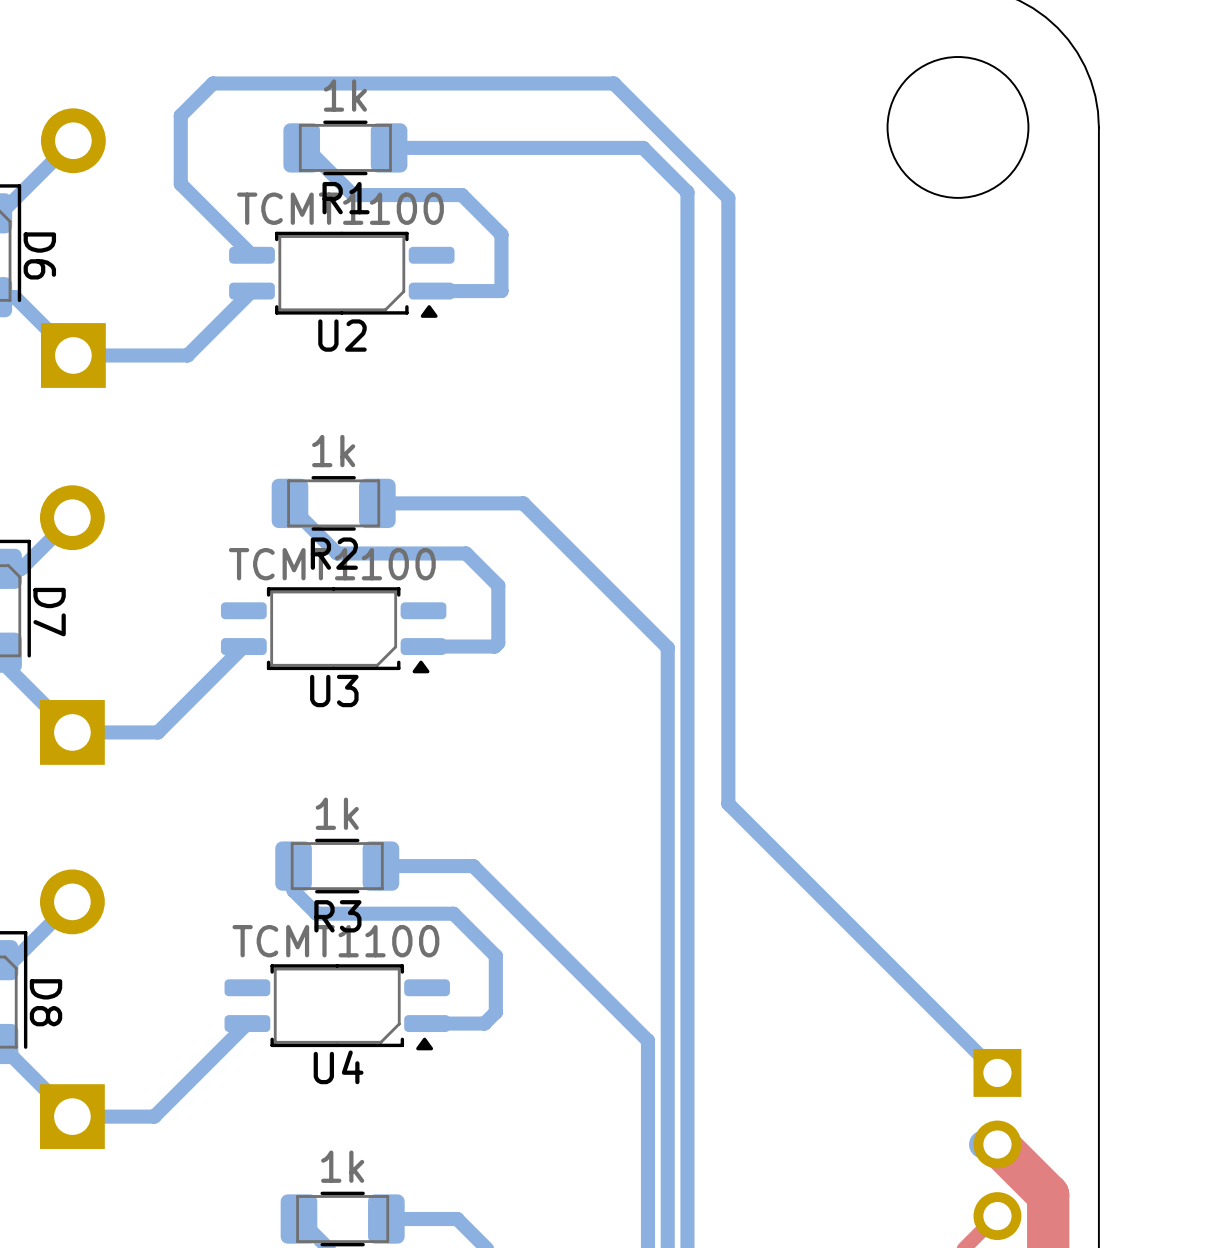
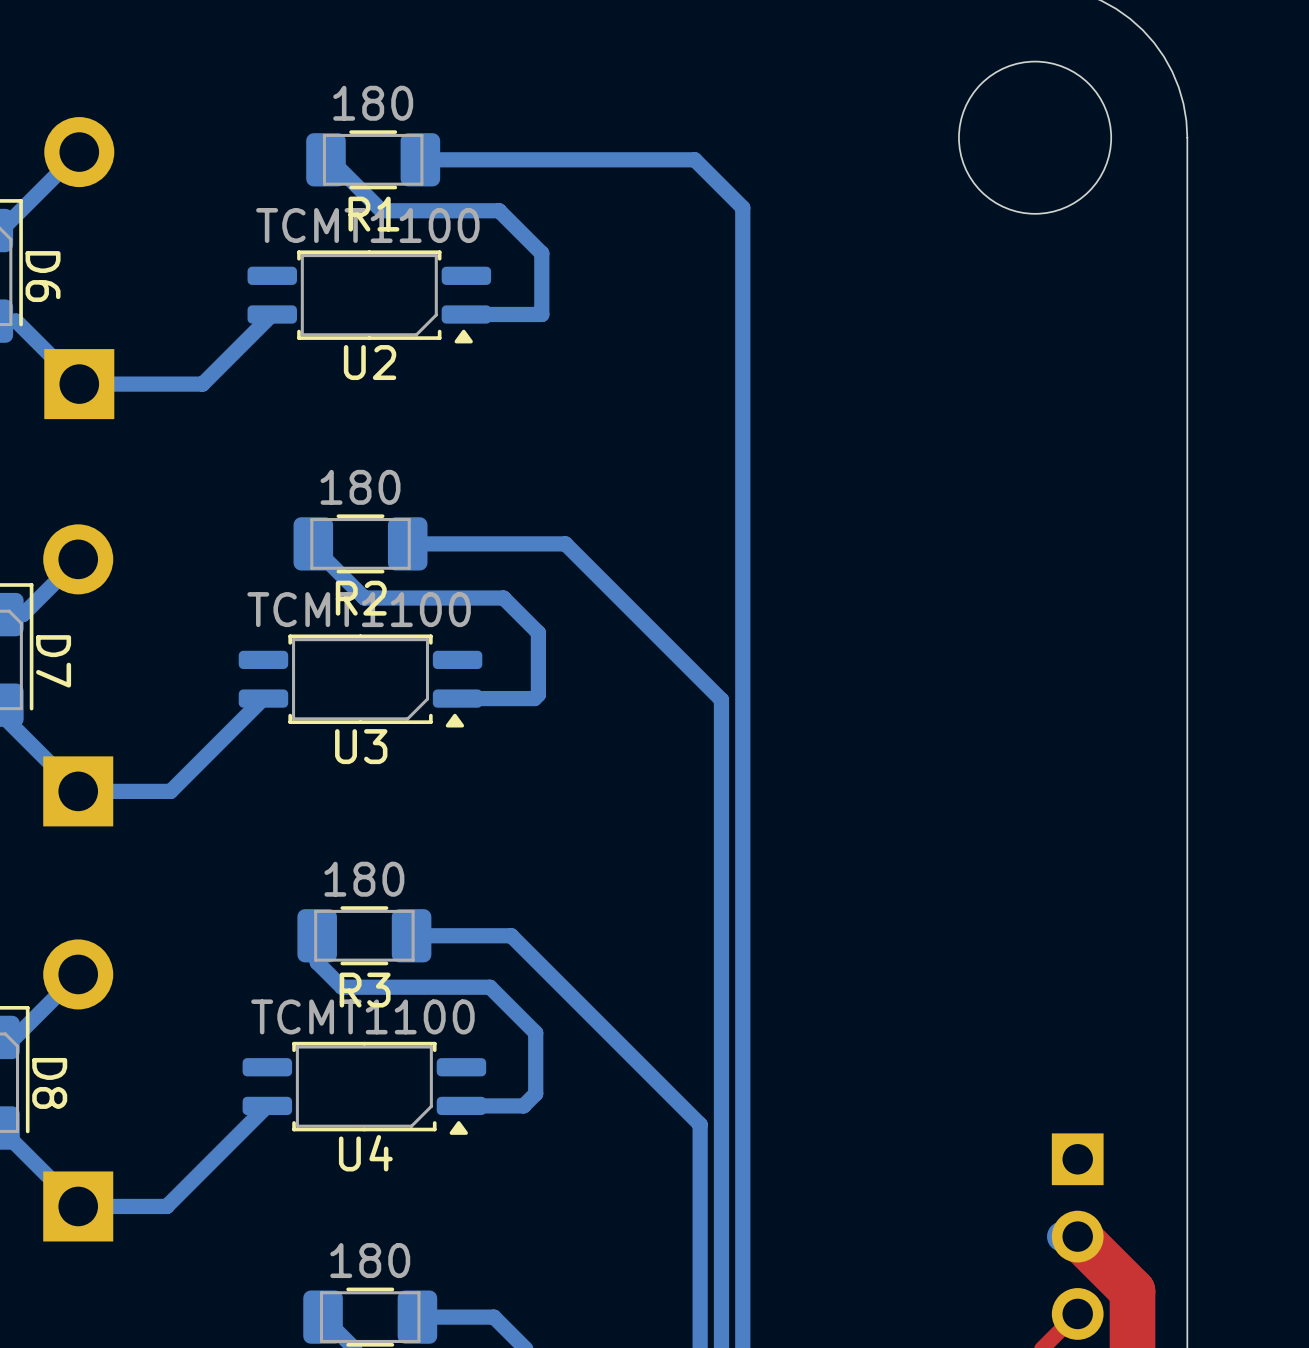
R1 value: 1k (345, 95) -> 180 (373, 103)
bottom track: (251, 255) (180, 184) (180, 115) (212, 83) (613, 83) (728, 198) (728, 803) (997, 1072) -> none
R2 value: 1k (333, 451) -> 180 (360, 487)
R3 value: 1k (337, 813) -> 180 (364, 879)
part value: 1k (342, 1166) -> 180 (370, 1260)

